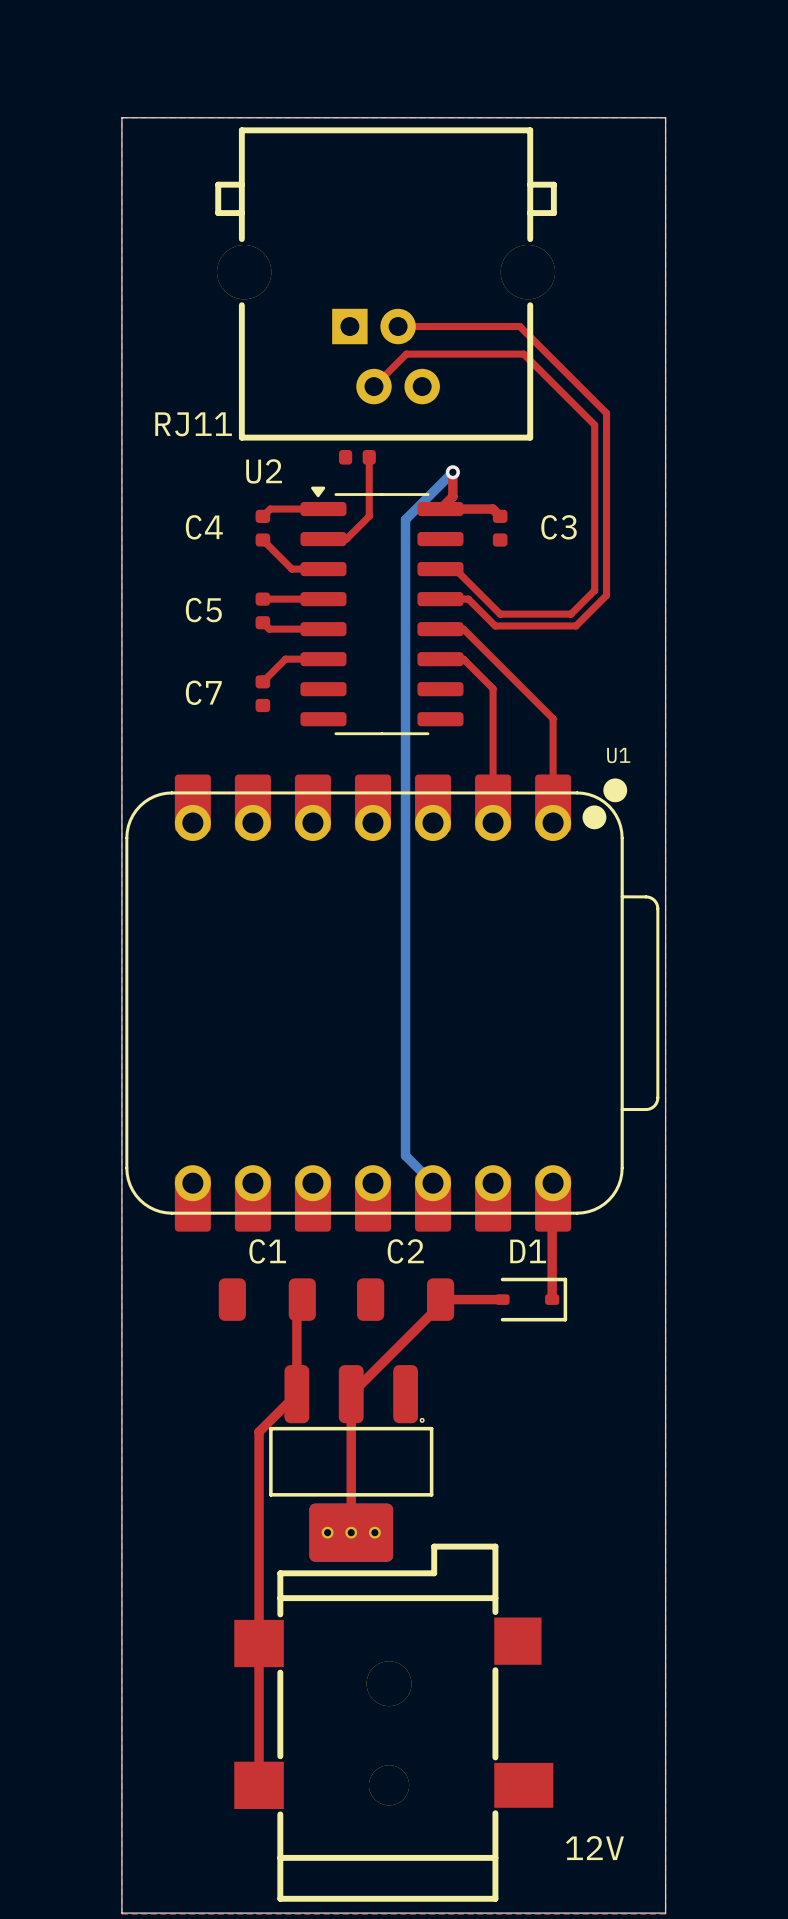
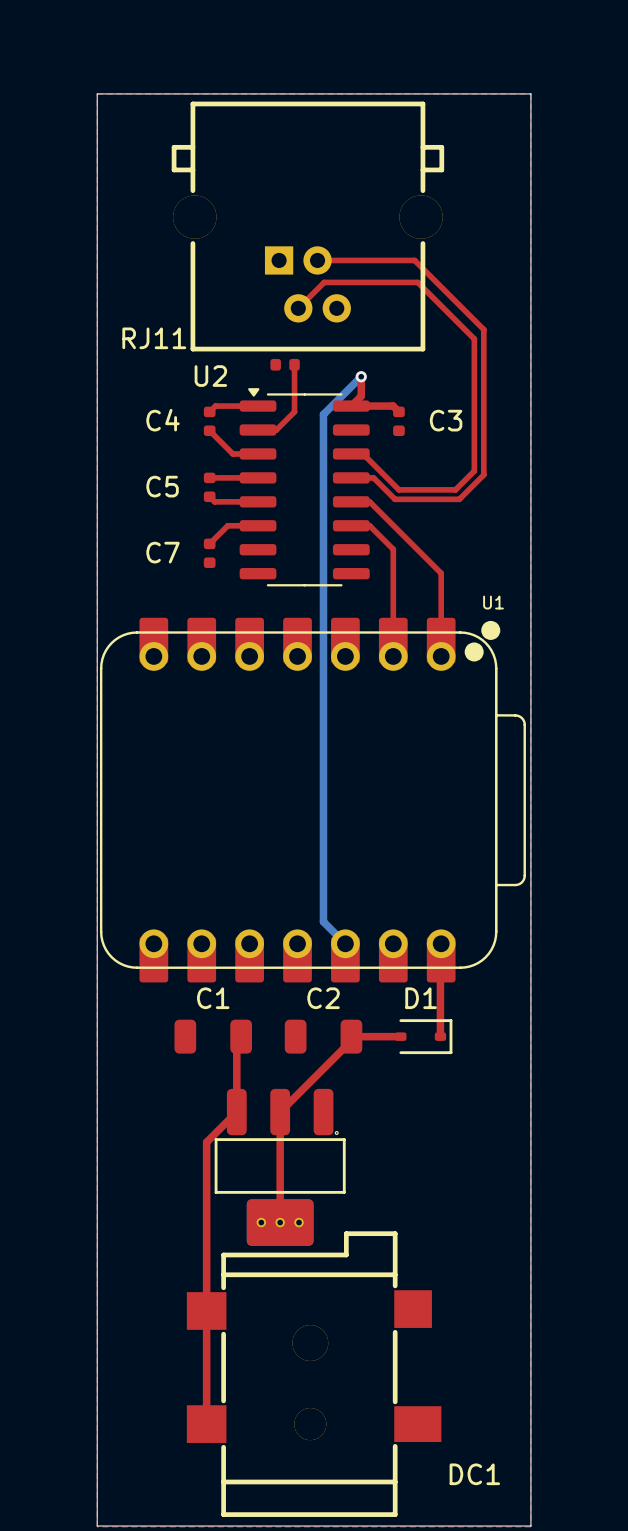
12V name: 12V (594, 1848) -> DC1 (474, 1474)

